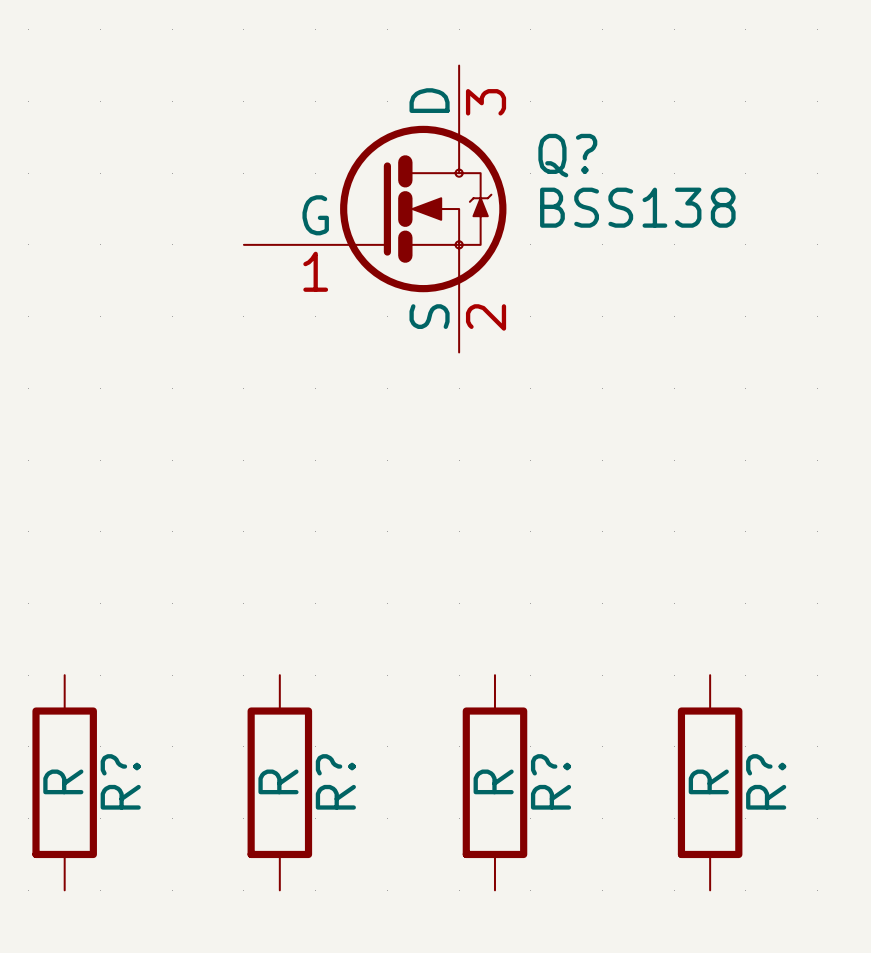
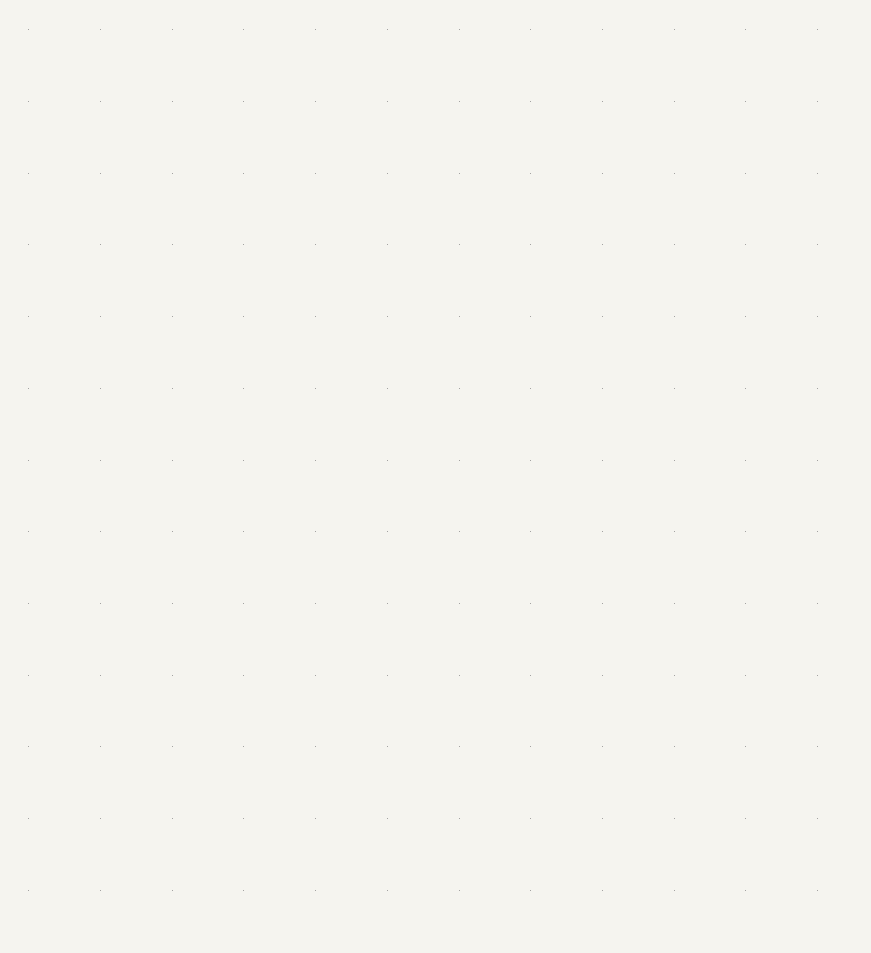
Q?: BSS138 (375, 209) -> none
R?: R (64, 782) -> none
R?: R (279, 782) -> none
R?: R (494, 782) -> none
R?: R (710, 782) -> none

